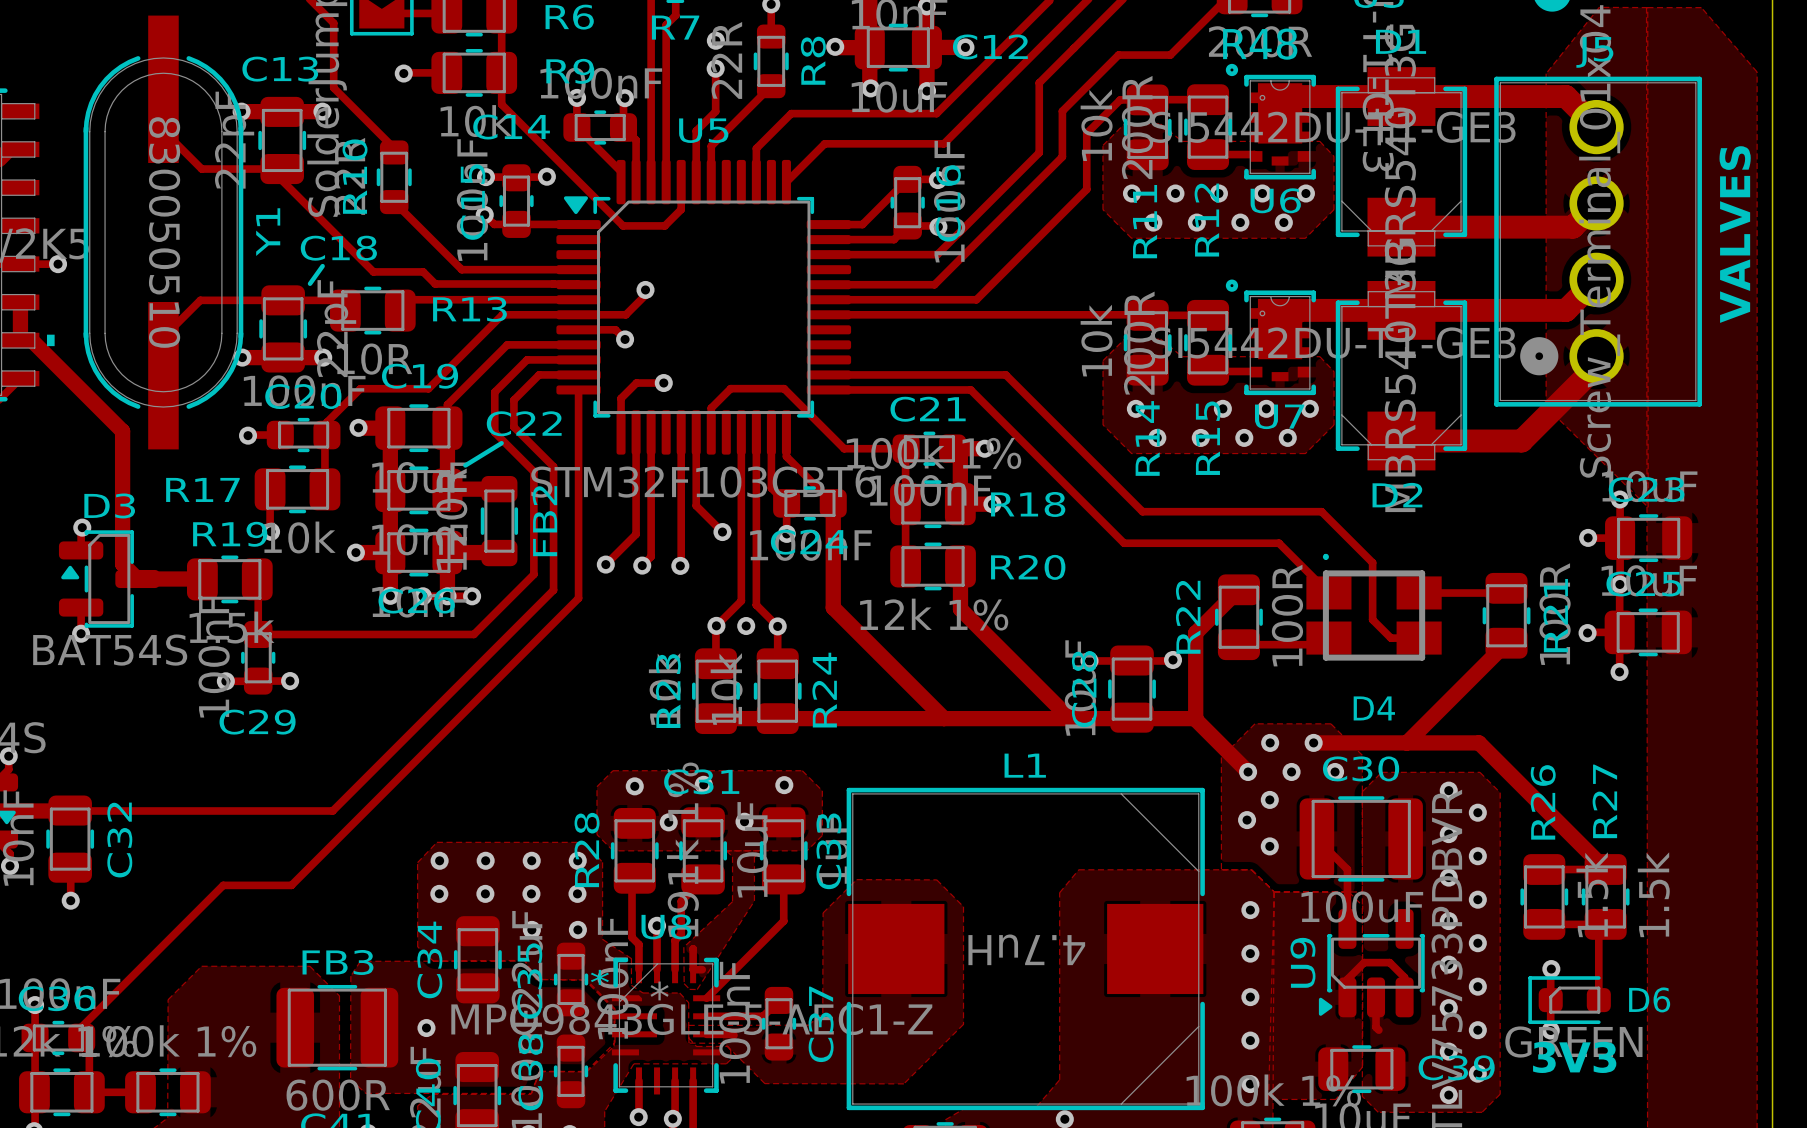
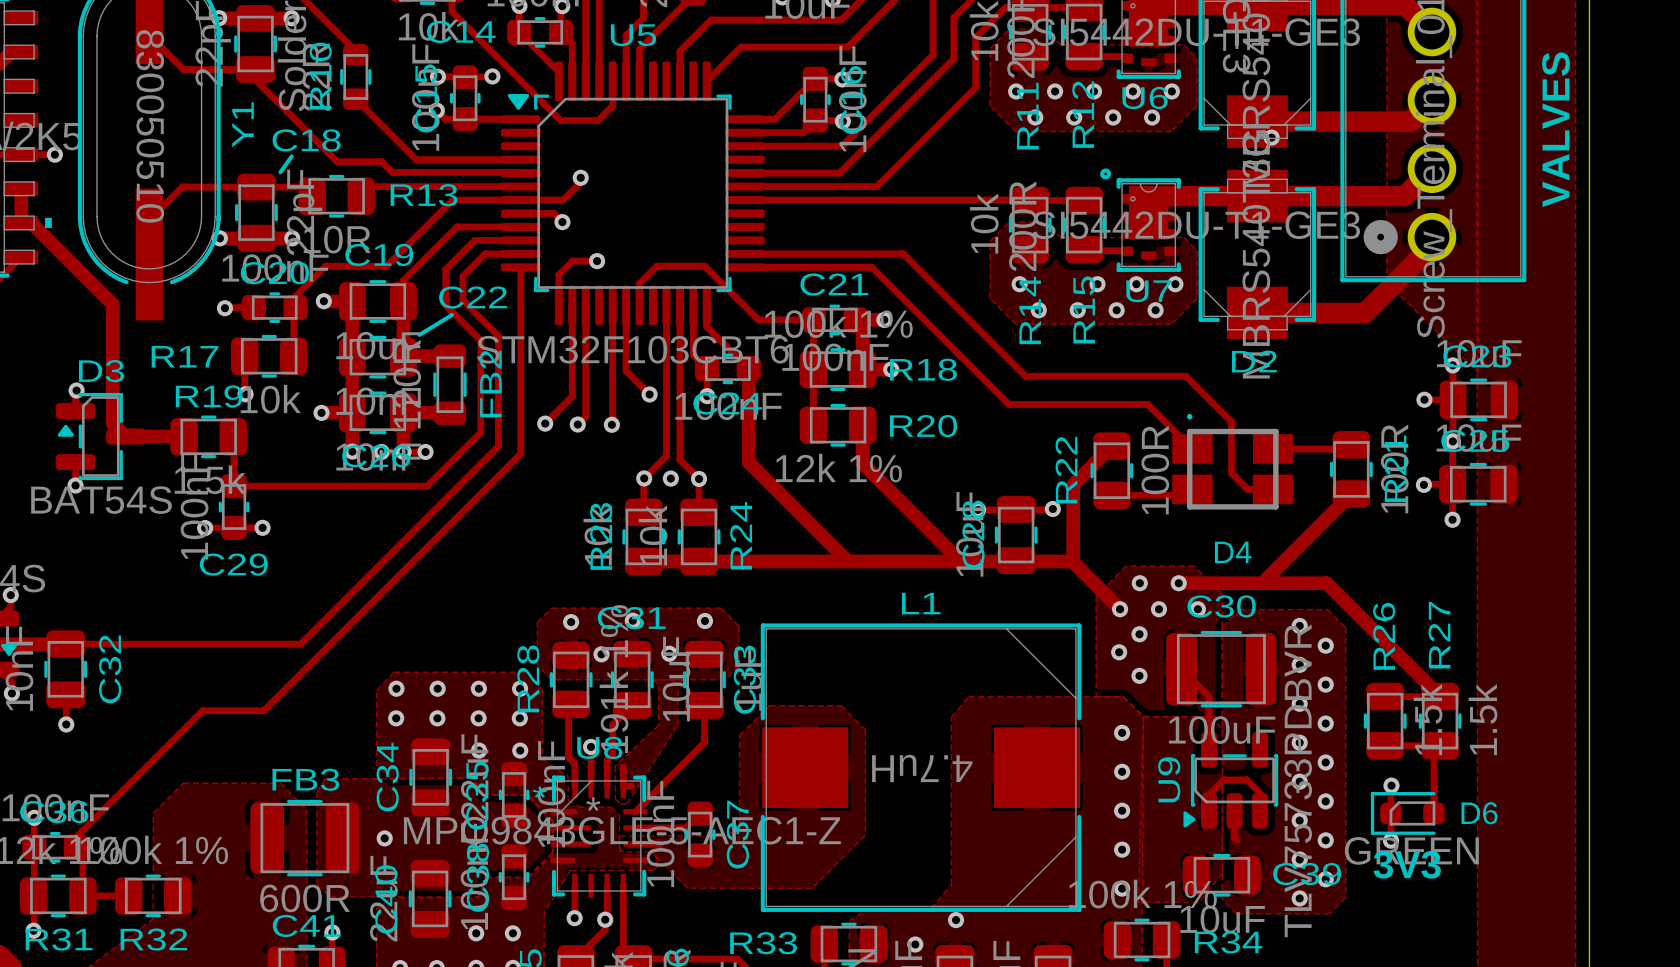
via: none -> (1271, 137)

